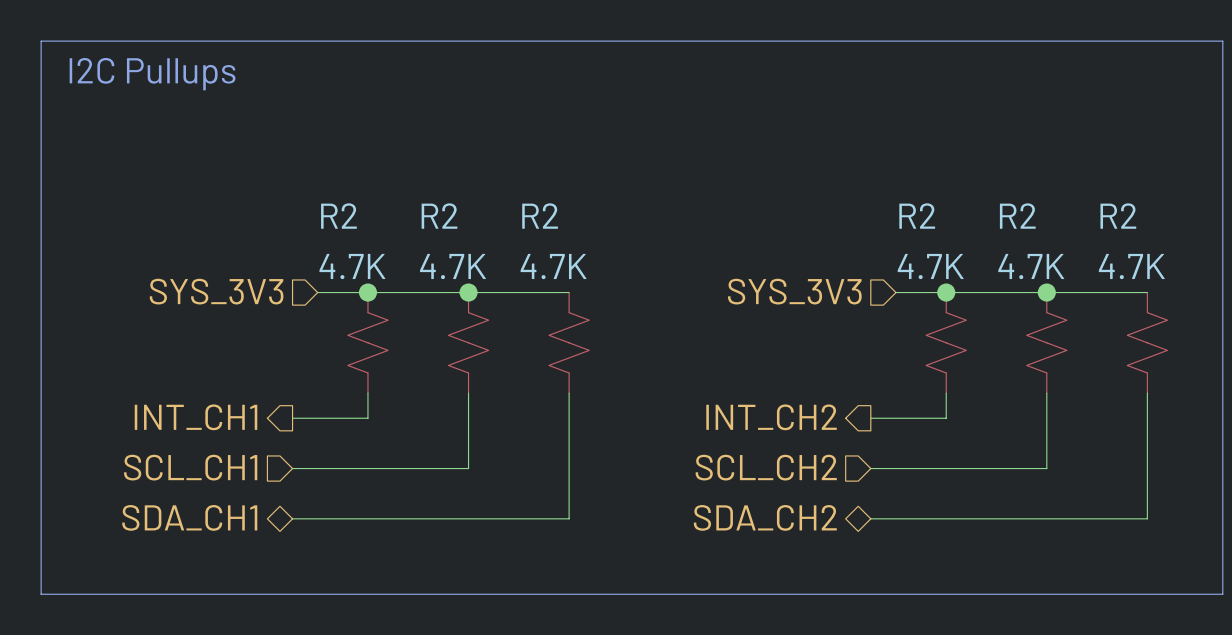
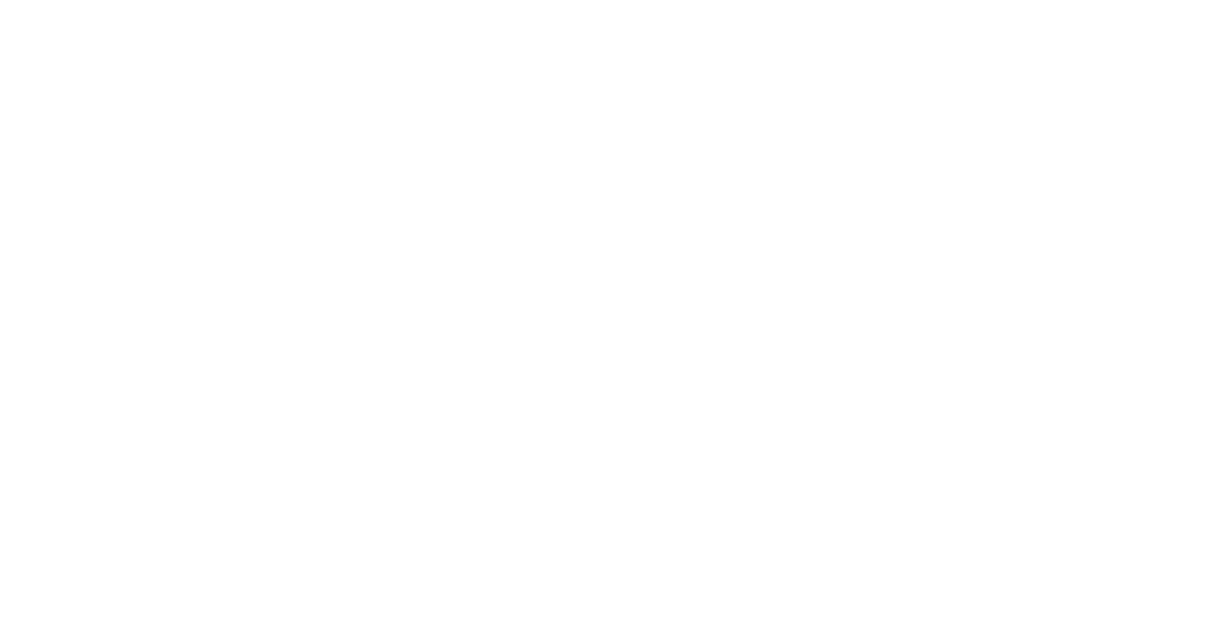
line: (41, 41) (1222, 41) (1222, 594) (41, 594) (41, 41) -> none
text: I2C Pullups (152, 74) -> none
hierarchical label: SYS_3V3 (216, 291) -> none
hierarchical label: SYS_3V3 (794, 291) -> none
wire: (317, 292) (569, 292) -> none
junction: (367, 292) -> none
junction: (468, 292) -> none
wire: (895, 292) (1147, 292) -> none
junction: (946, 292) -> none
junction: (1046, 292) -> none
R2: 4.7K (367, 342) -> none
R2: 4.7K (468, 342) -> none
R2: 4.7K (569, 342) -> none
R2: 4.7K (946, 342) -> none
R2: 4.7K (1046, 342) -> none
R2: 4.7K (1147, 342) -> none
wire: (367, 393) (367, 418) (292, 418) -> none
wire: (468, 393) (468, 468) (292, 468) -> none
wire: (569, 393) (569, 518) (292, 518) -> none
wire: (946, 393) (946, 418) (870, 418) -> none
wire: (1046, 393) (1046, 468) (870, 468) -> none
wire: (1147, 393) (1147, 518) (870, 518) -> none
hierarchical label: INT_CH1 (196, 417) -> none
hierarchical label: INT_CH2 (771, 417) -> none
hierarchical label: SCL_CH1 (190, 467) -> none
hierarchical label: SCL_CH2 (766, 467) -> none
hierarchical label: SDA_CH1 (189, 517) -> none
hierarchical label: SDA_CH2 (765, 517) -> none

